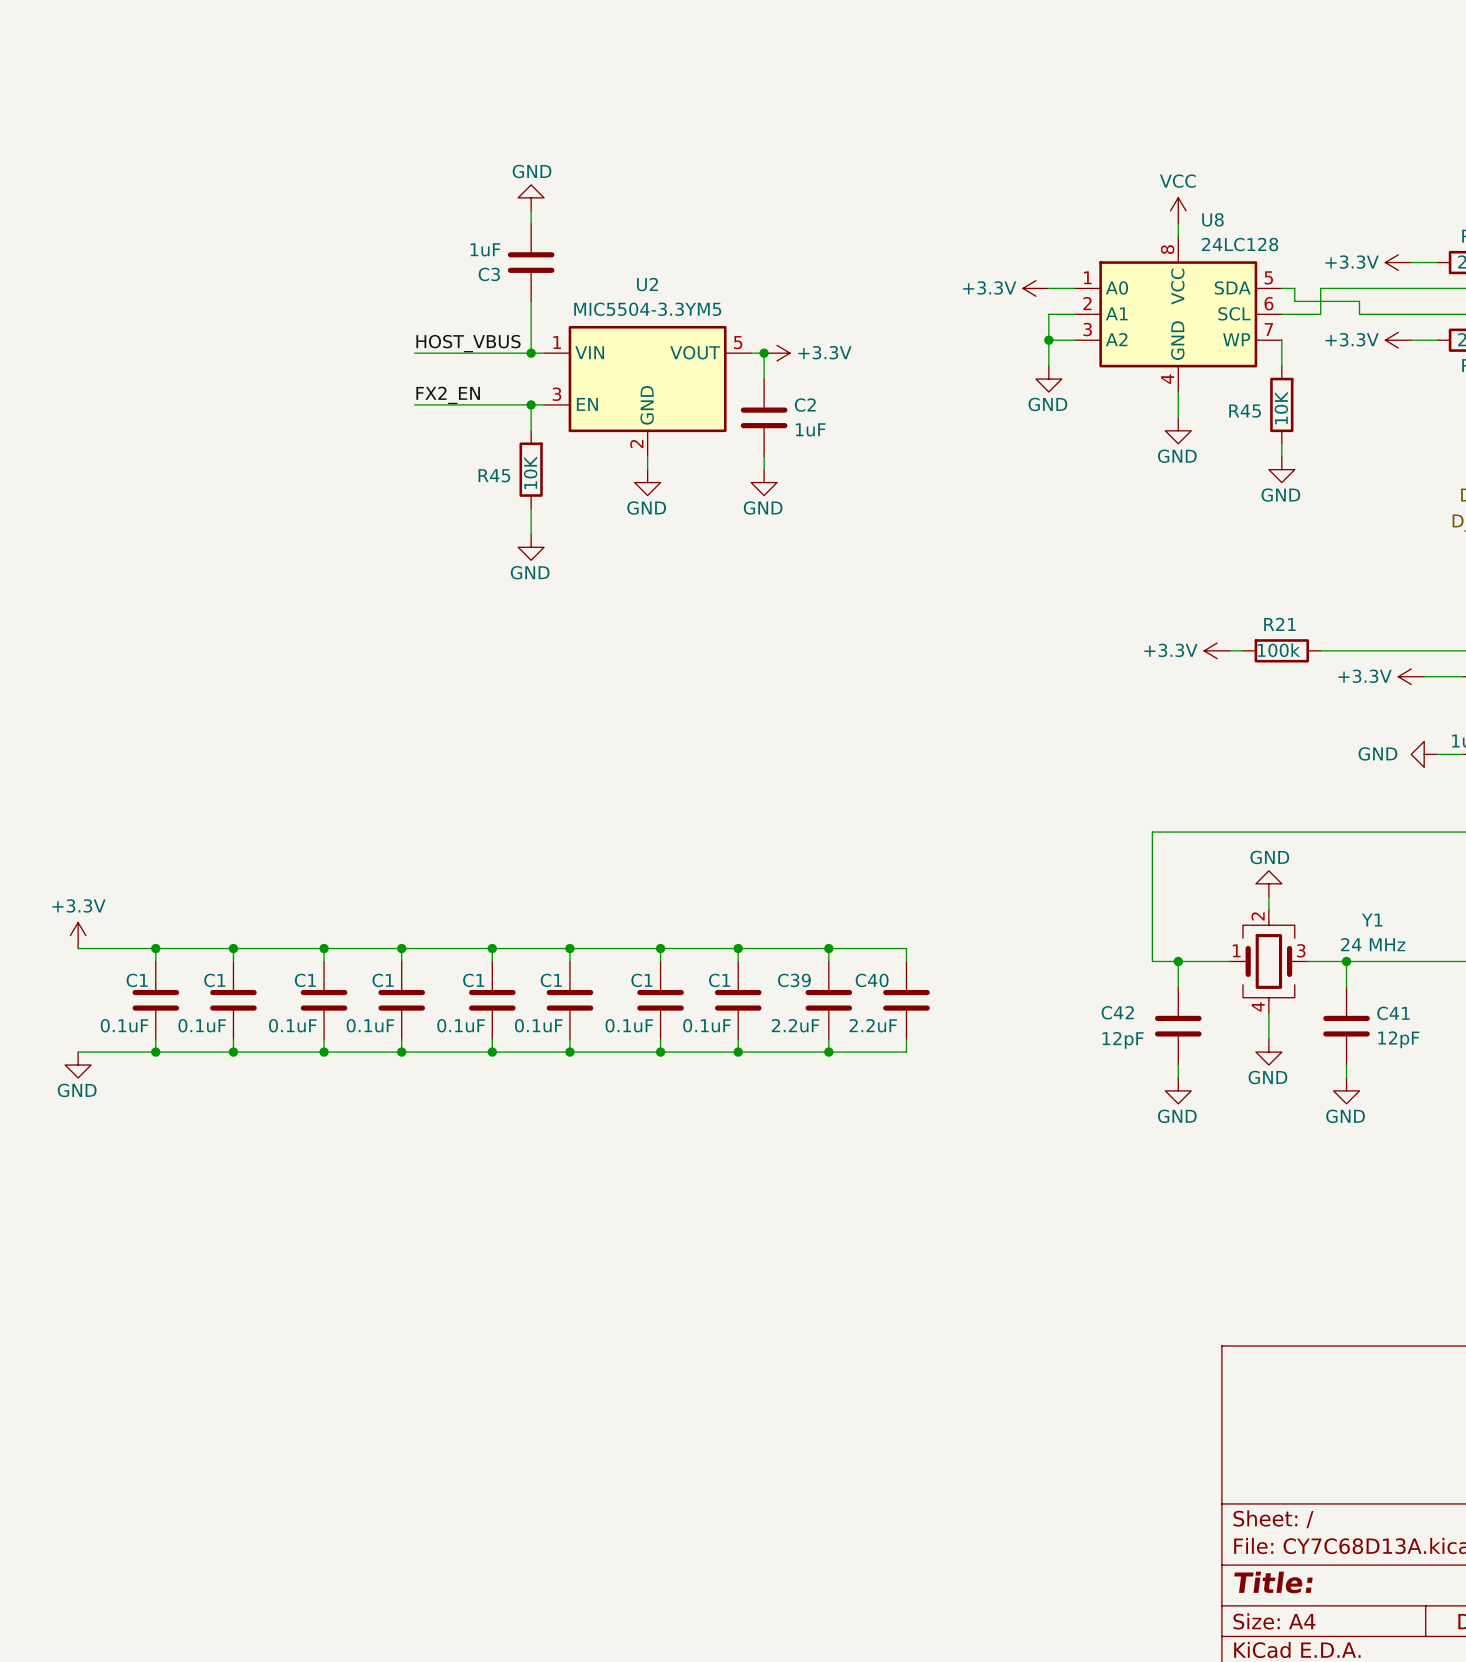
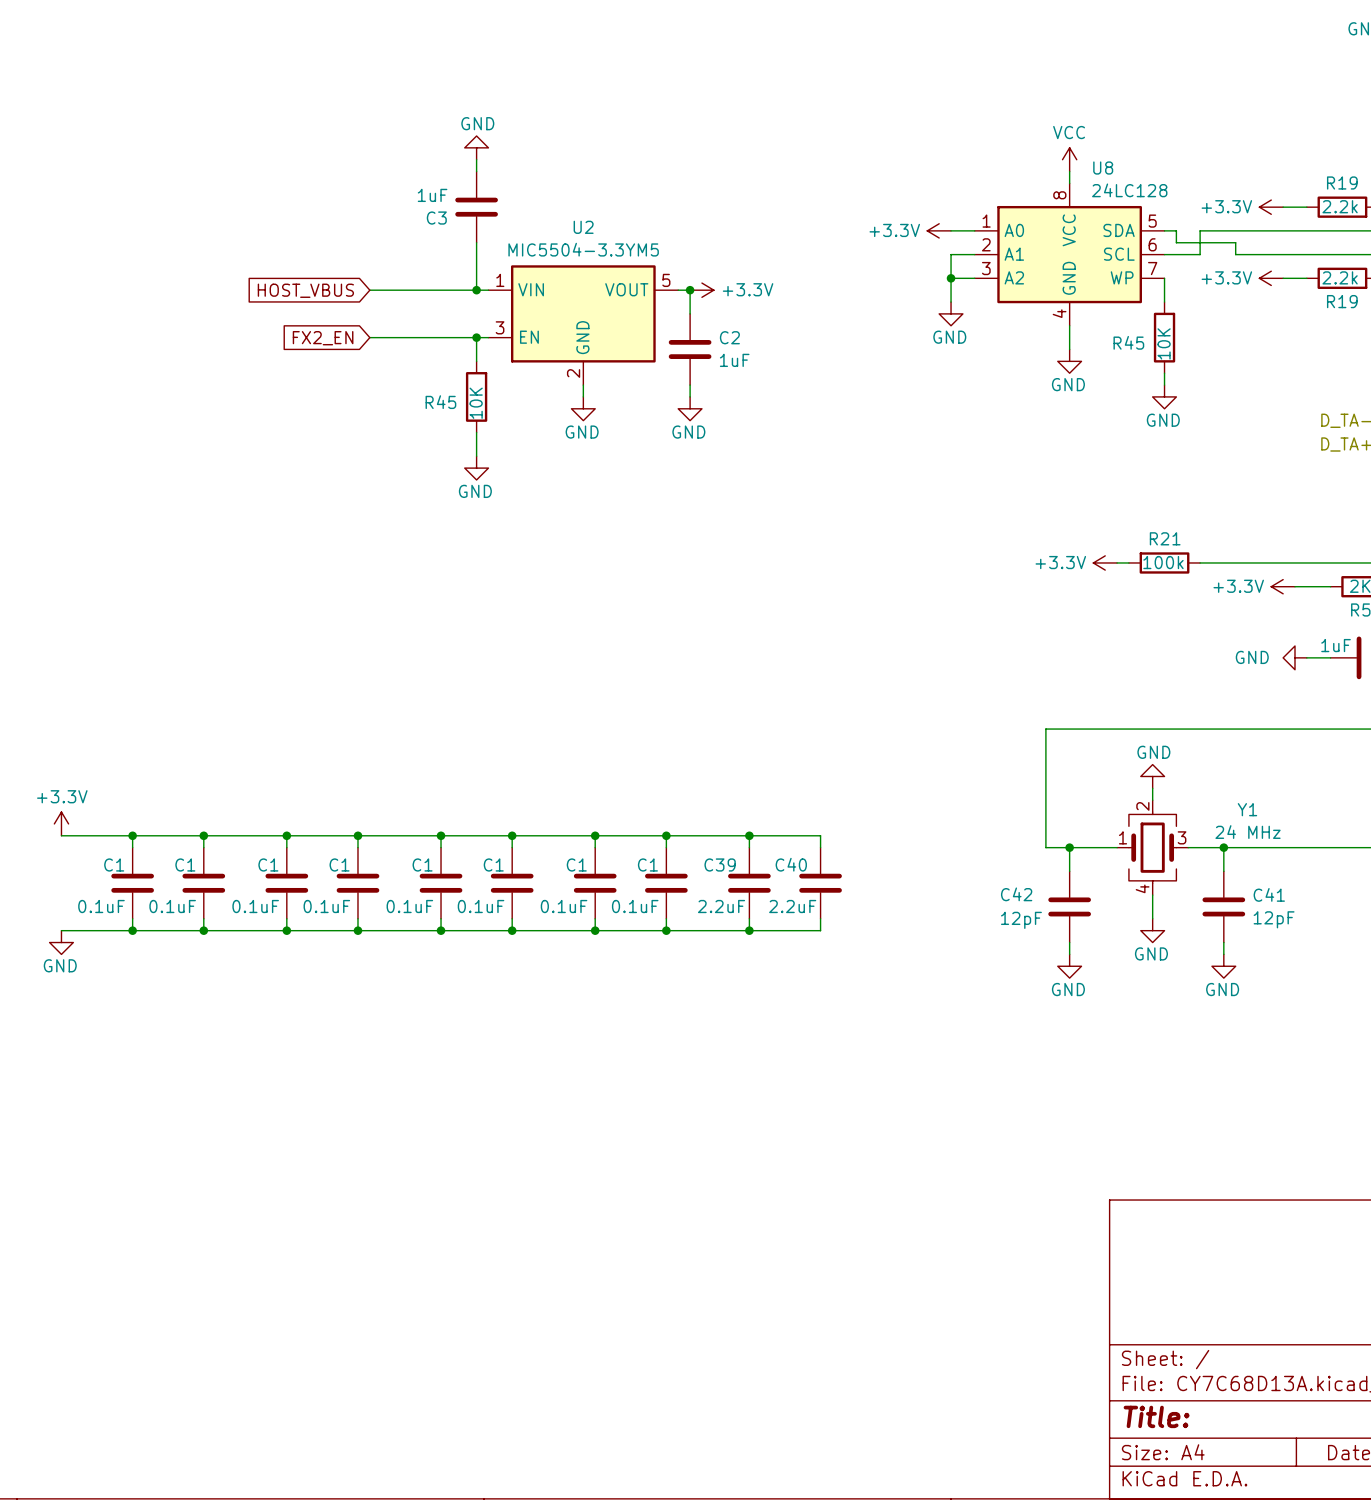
label: HOST_VBUS (468, 343) -> none
global label: none -> HOST_VBUS (305, 290)
label: FX2_EN (448, 395) -> none
global label: none -> FX2_EN (323, 338)

